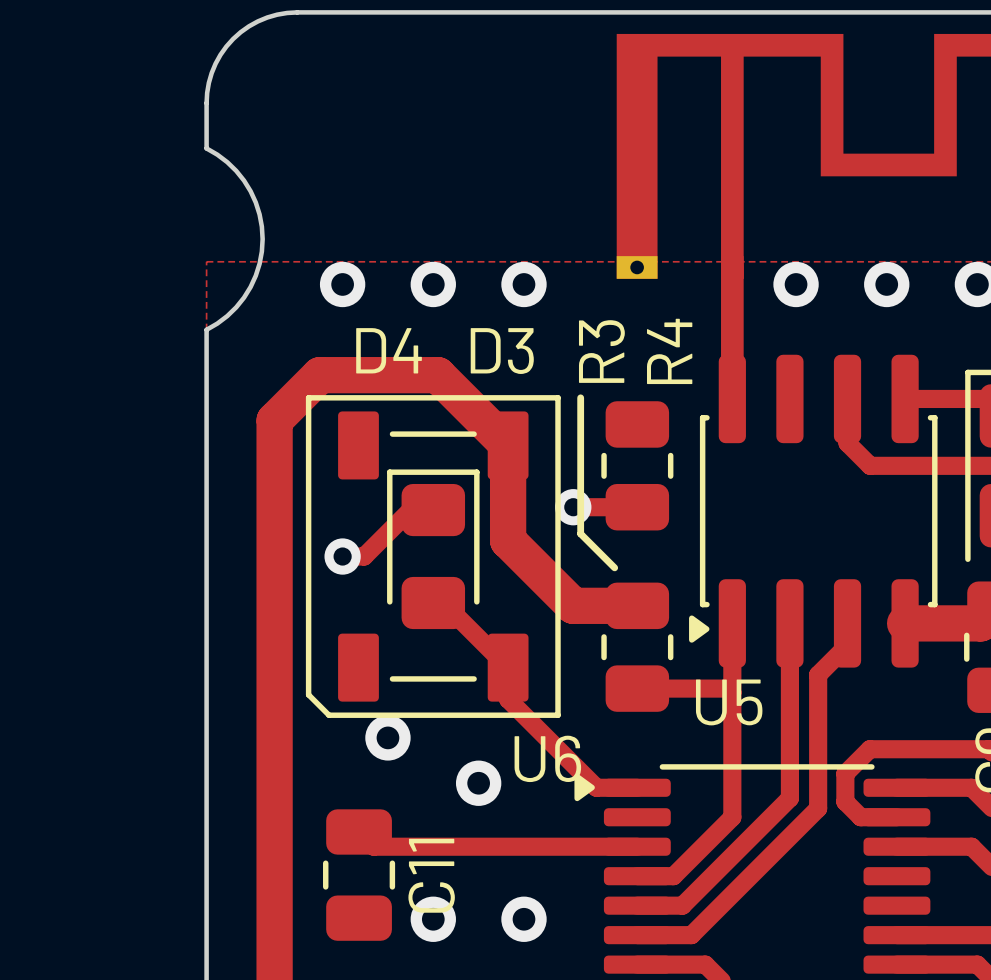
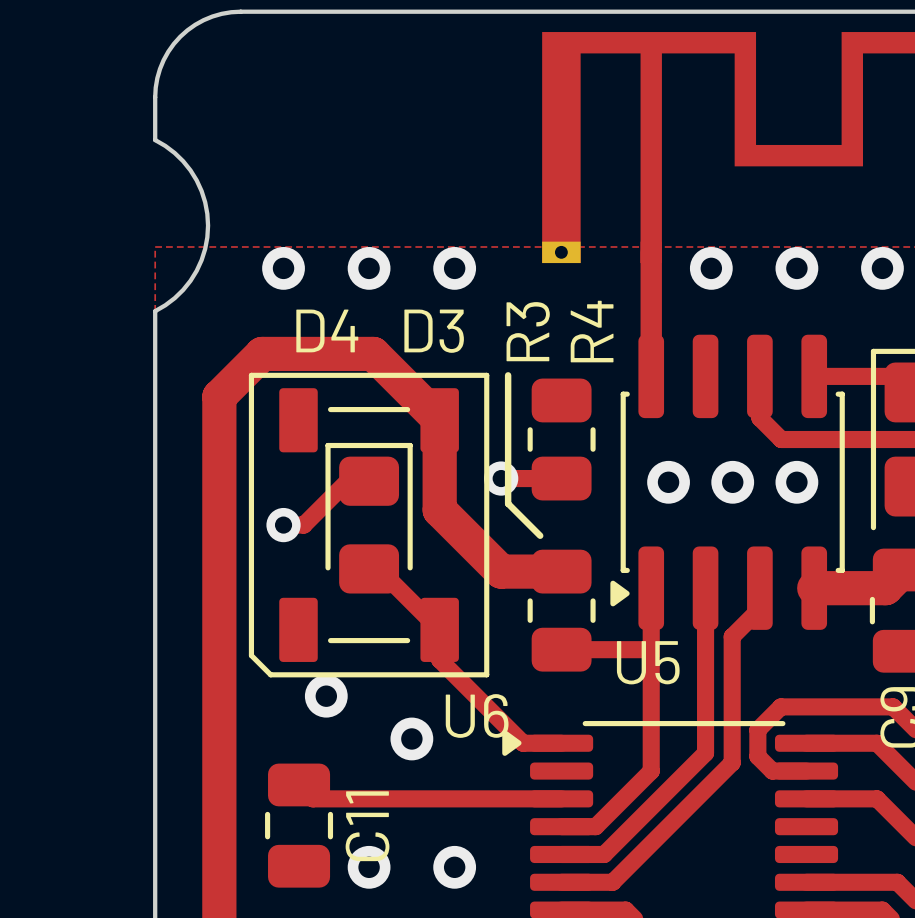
via: none -> (668, 482)
via: none -> (732, 482)
via: none -> (796, 482)

